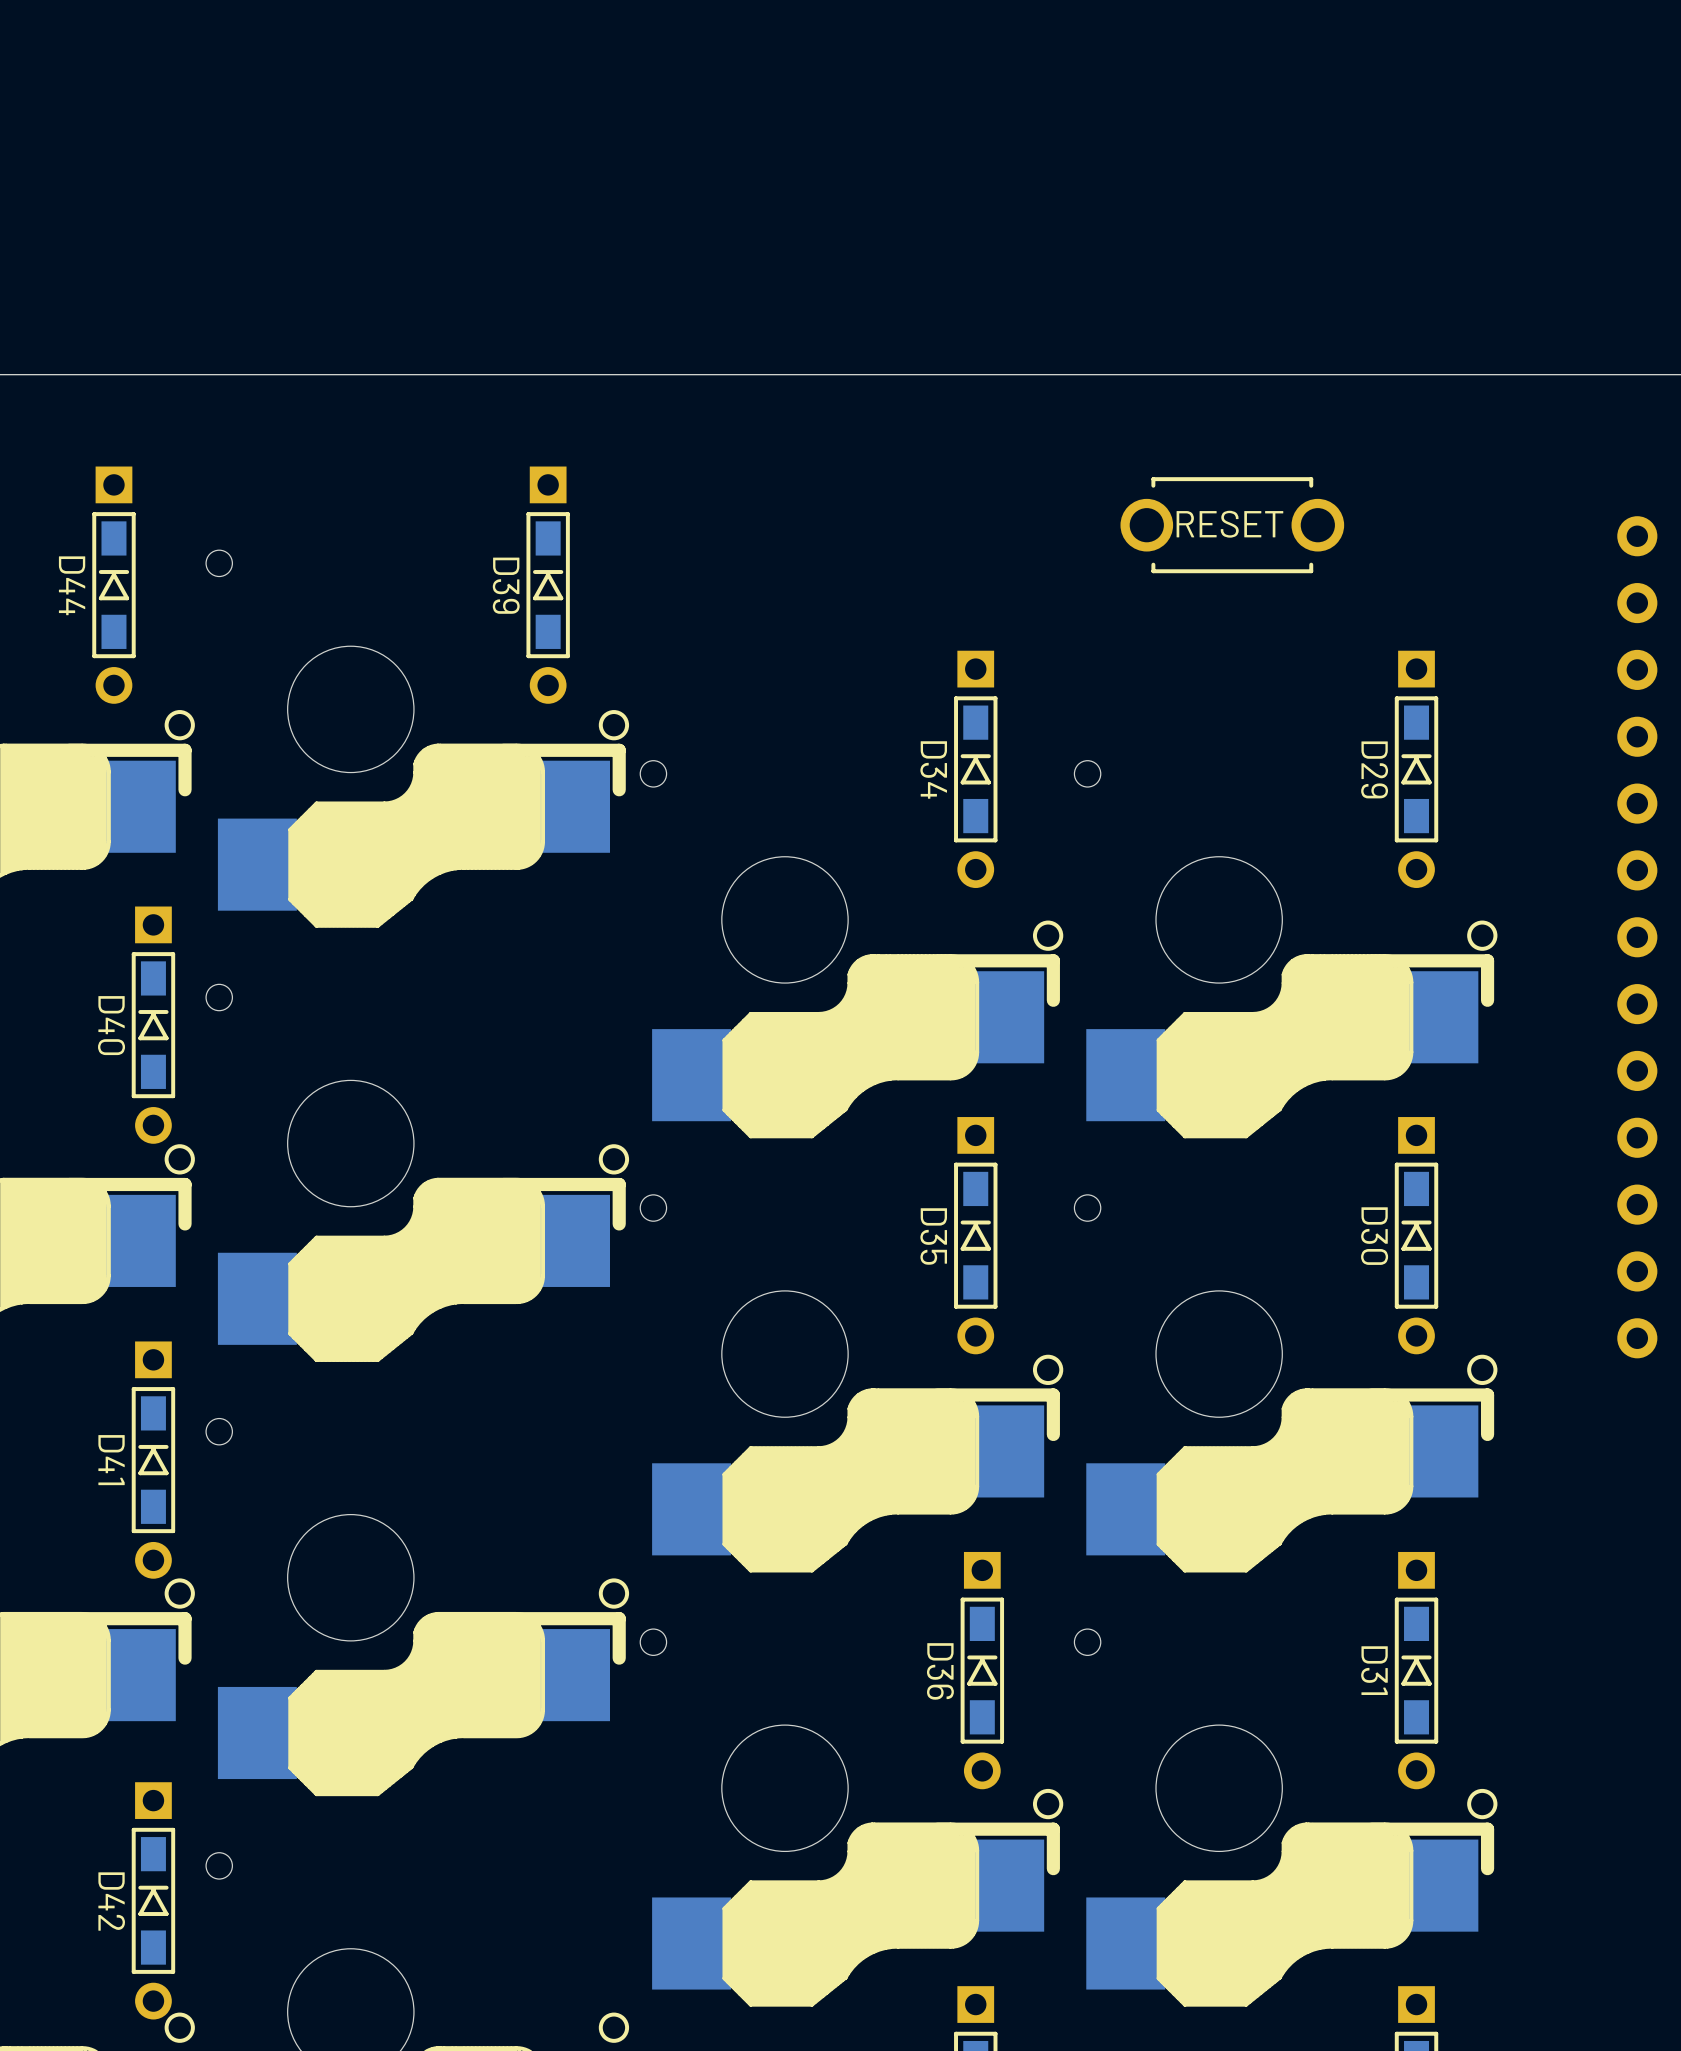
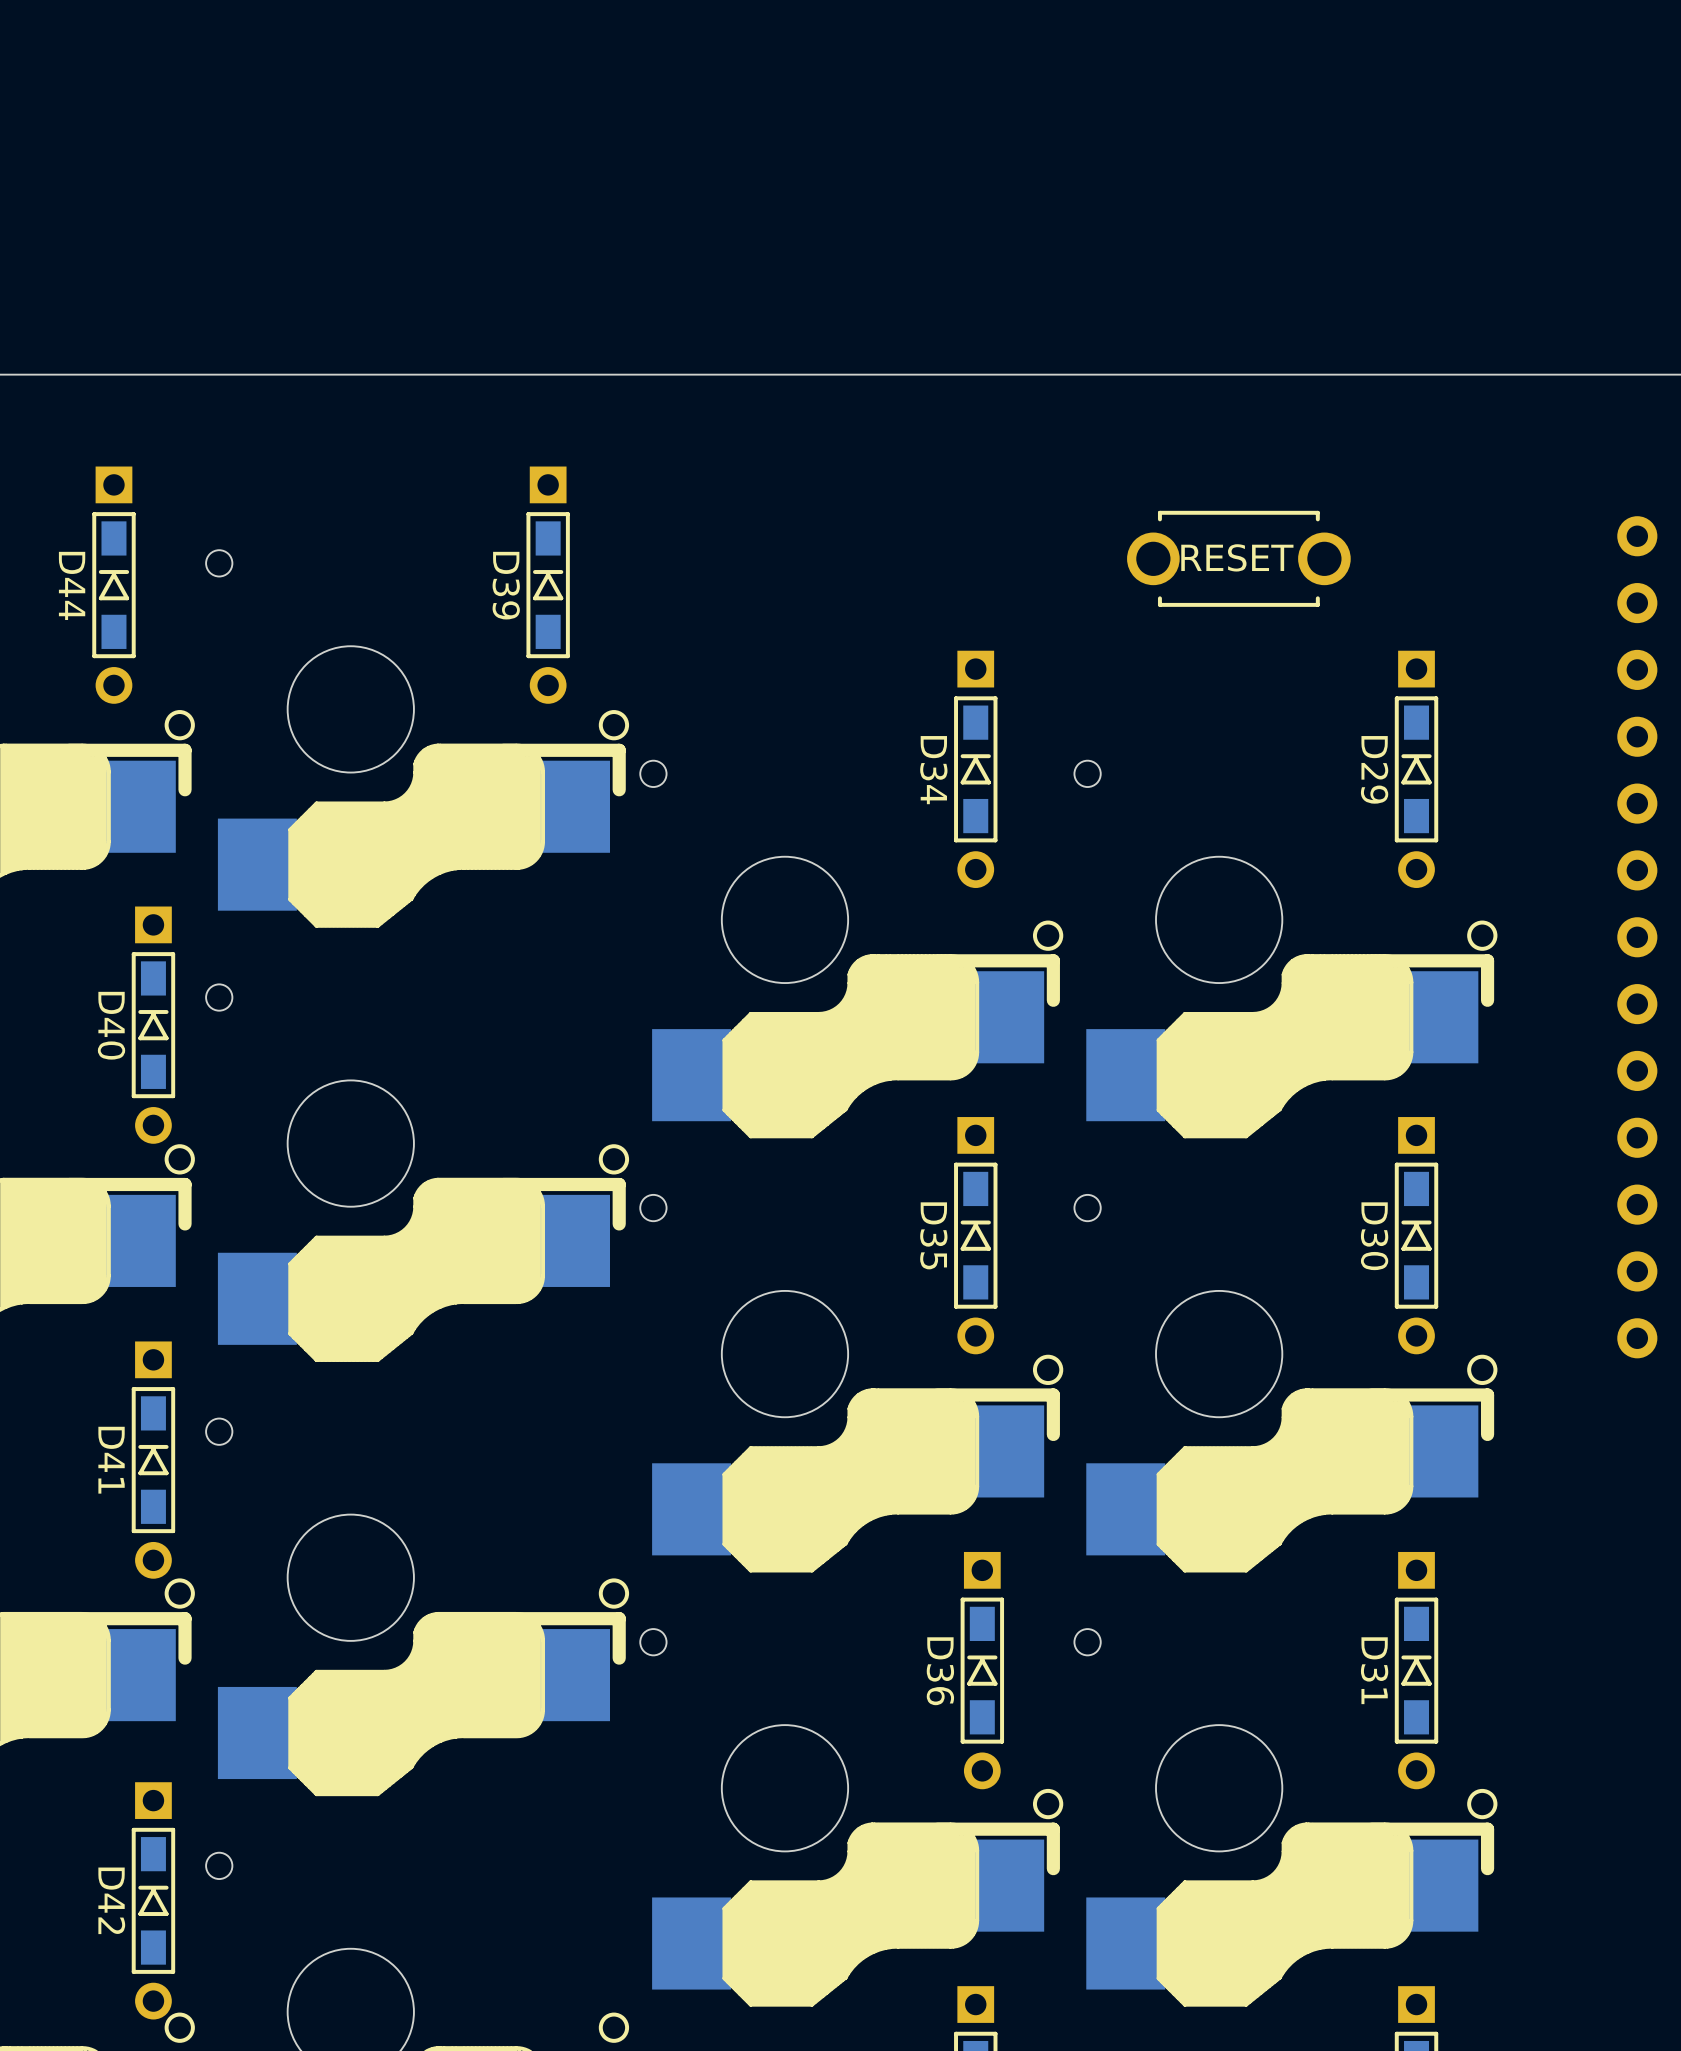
part position: (1232, 525) -> (1238, 558)

